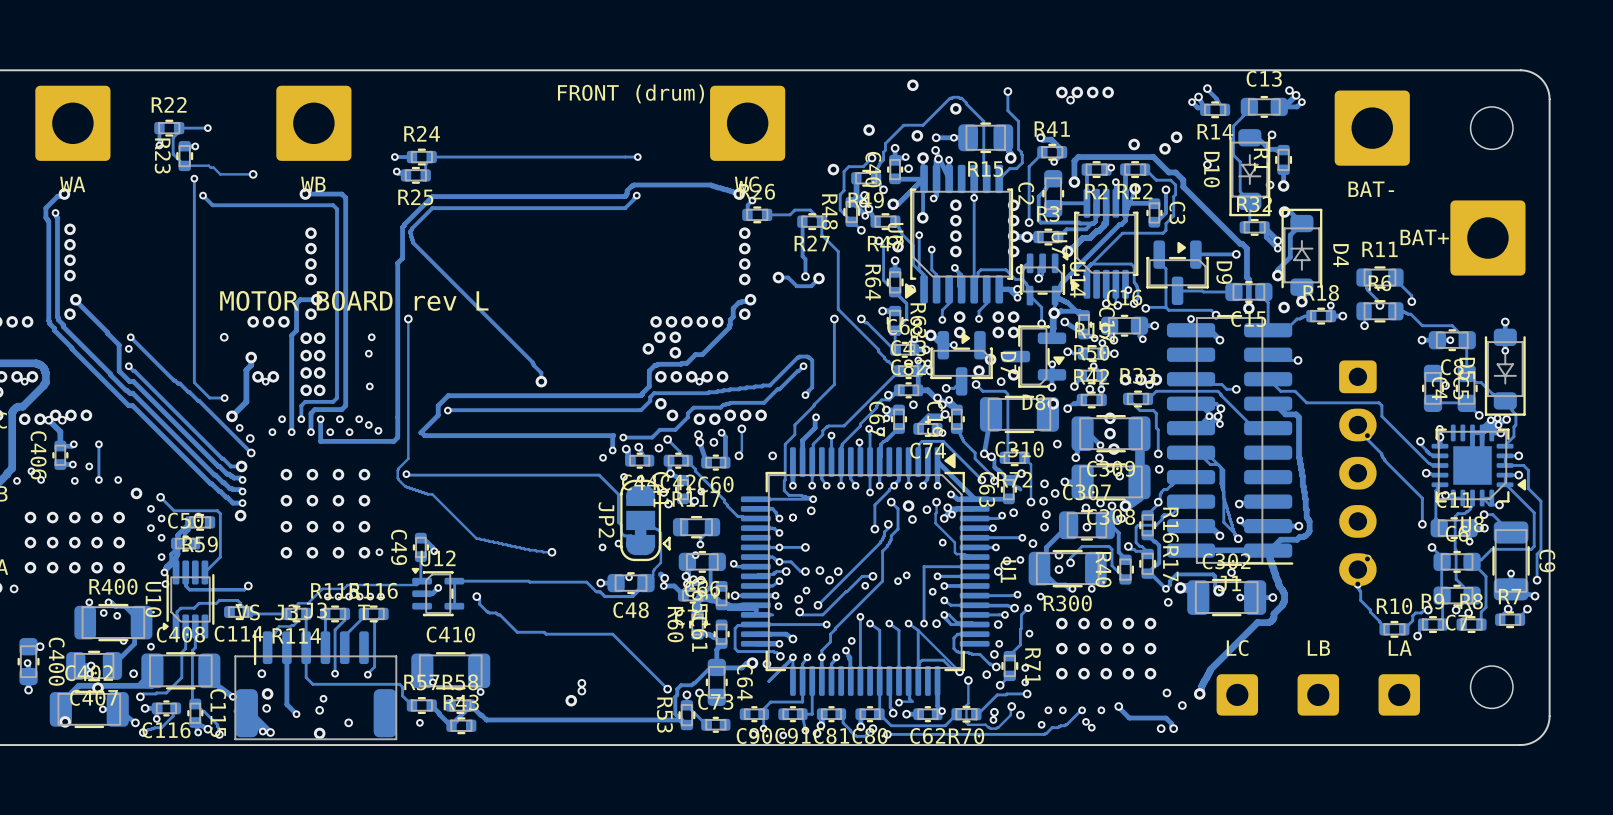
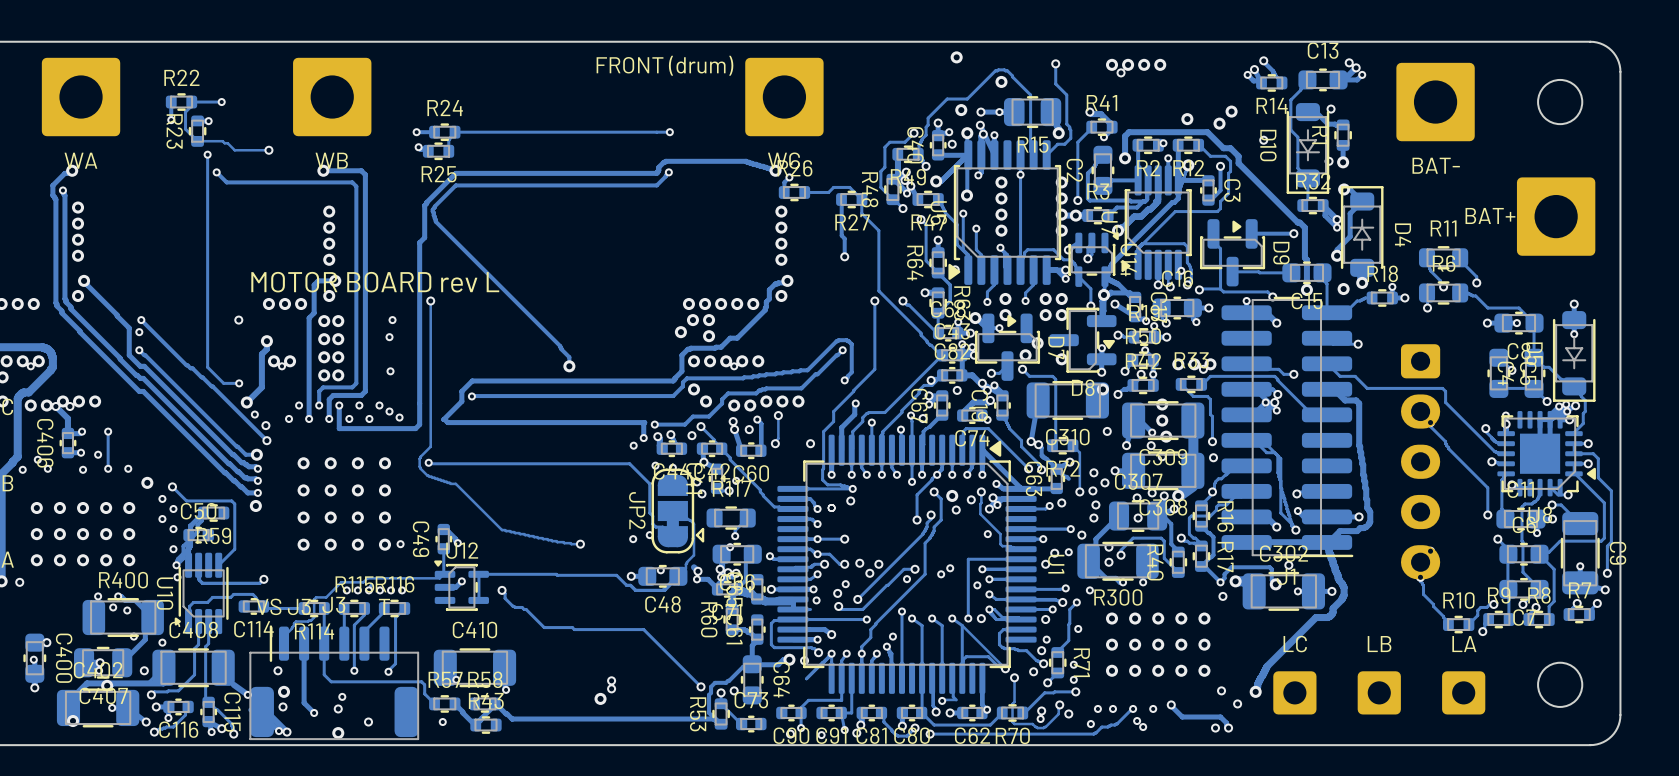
via: (869, 130) -> none
via: (833, 169) -> none
via: (898, 246) -> none
track: (778, 277) (788, 277) (796, 286) (811, 286) (818, 278) -> none
via: (778, 277) -> none
via: (818, 278) -> none
via: (1001, 381) -> none
via: (1119, 476) -> none
via: (992, 528) -> none

